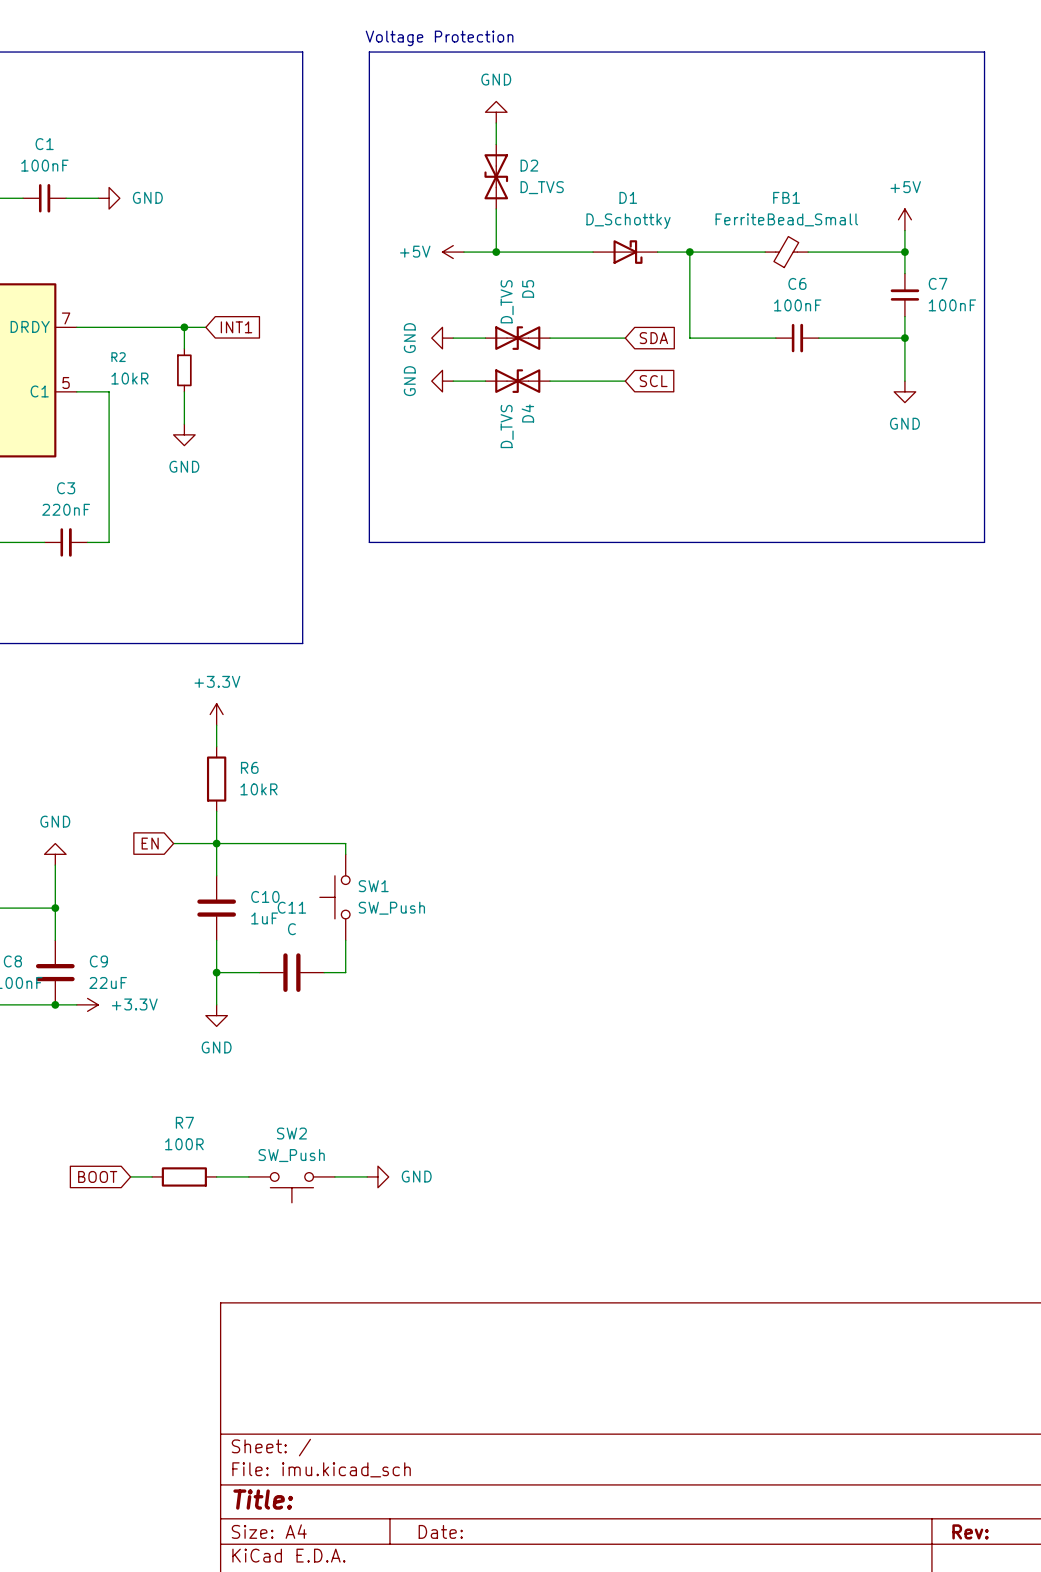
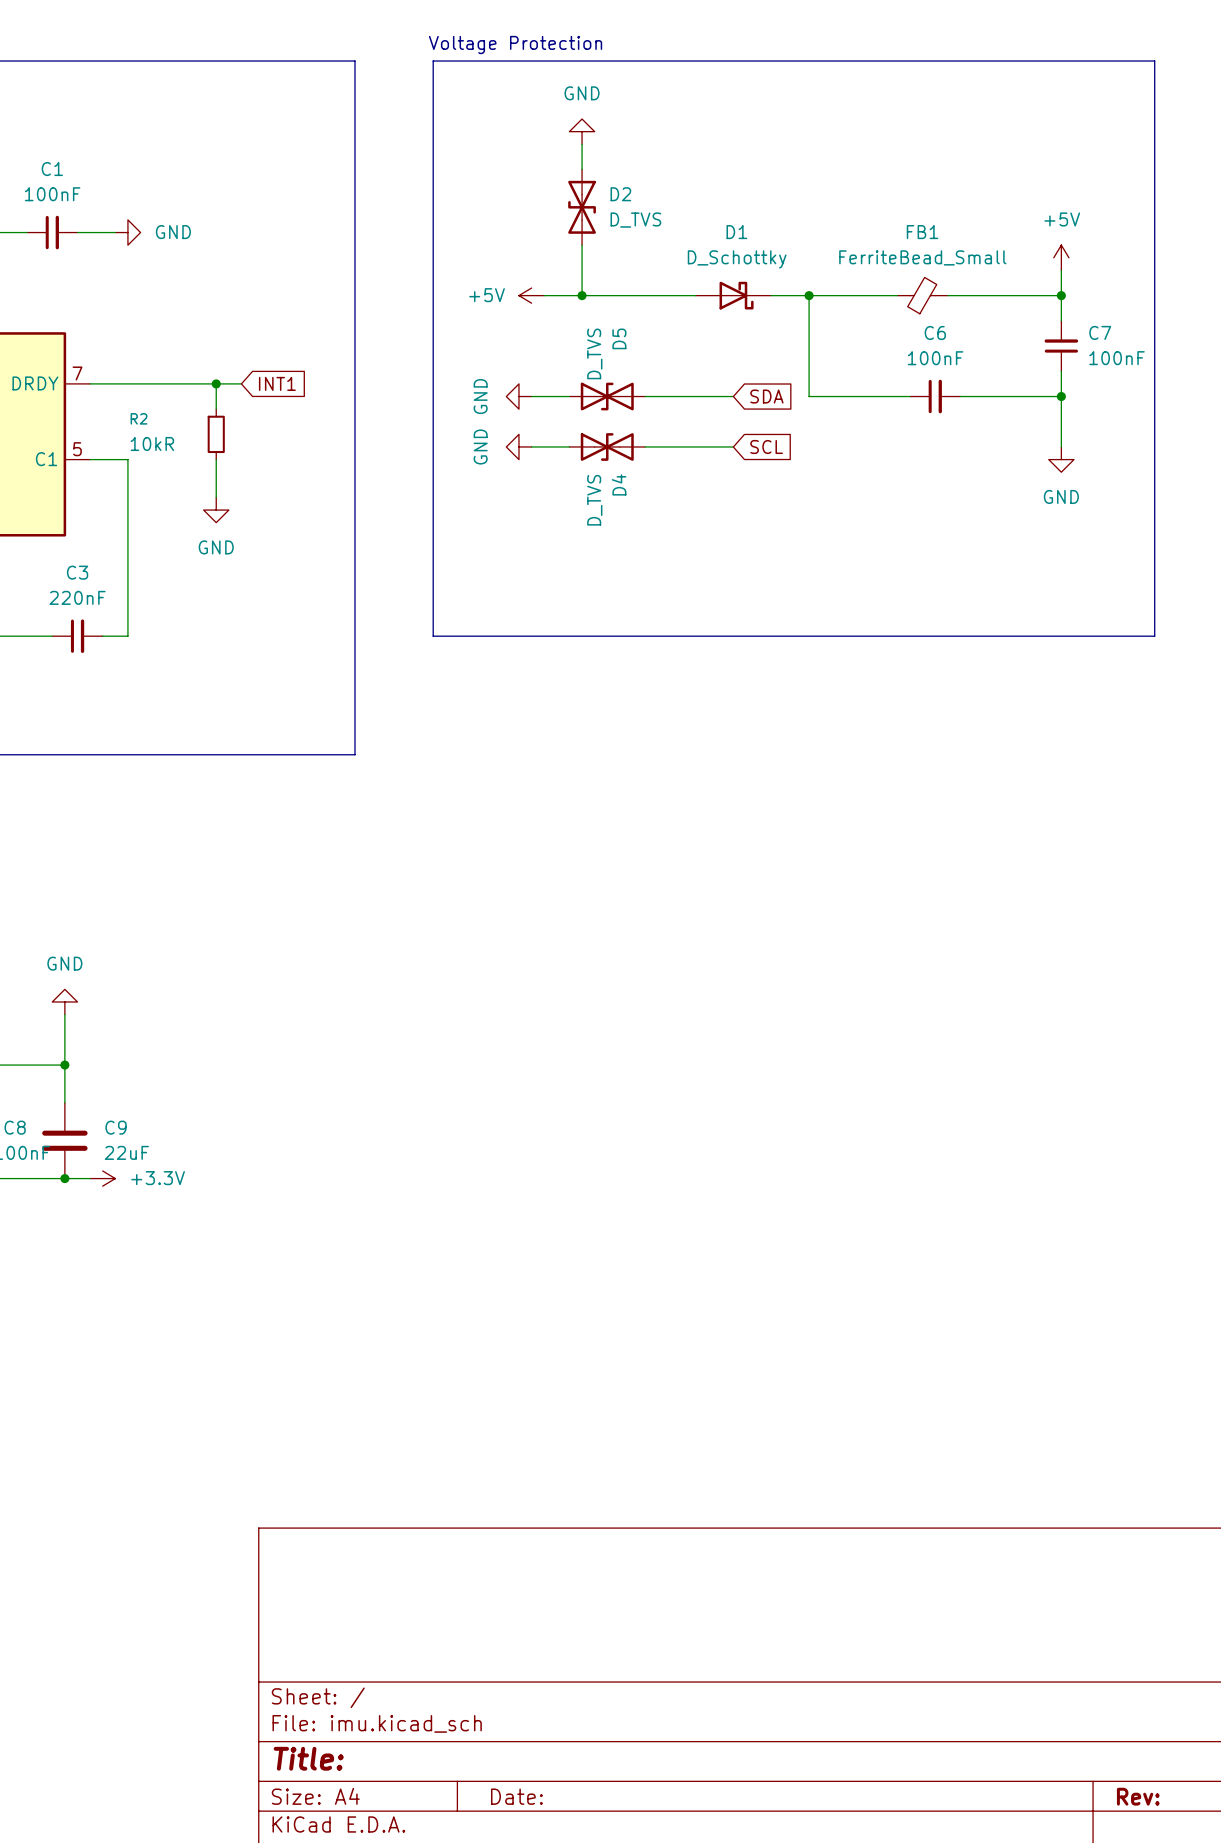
power symbol: +3.3V (216, 714) -> none
wire: (216, 725) (216, 746) -> none
R6: 10kR (216, 779) -> none
wire: (216, 811) (216, 875) -> none
global label: EN (150, 843) -> none
wire: (173, 843) (345, 843) (345, 854) -> none
junction: (216, 843) -> none
SW1: SW_Push (334, 897) -> none
C10: 1uF (216, 908) -> none
wire: (216, 940) (216, 1004) -> none
wire: (345, 940) (345, 972) (324, 972) -> none
wire: (216, 972) (259, 972) -> none
junction: (216, 972) -> none
C11: C (291, 972) -> none
power symbol: GND (216, 1015) -> none
global label: BOOT (97, 1176) -> none
wire: (130, 1176) (152, 1176) -> none
R7: 100R (184, 1176) -> none
wire: (216, 1176) (248, 1176) -> none
wire: (334, 1176) (367, 1176) -> none
power symbol: GND (377, 1176) -> none
SW2: SW_Push (291, 1187) -> none

